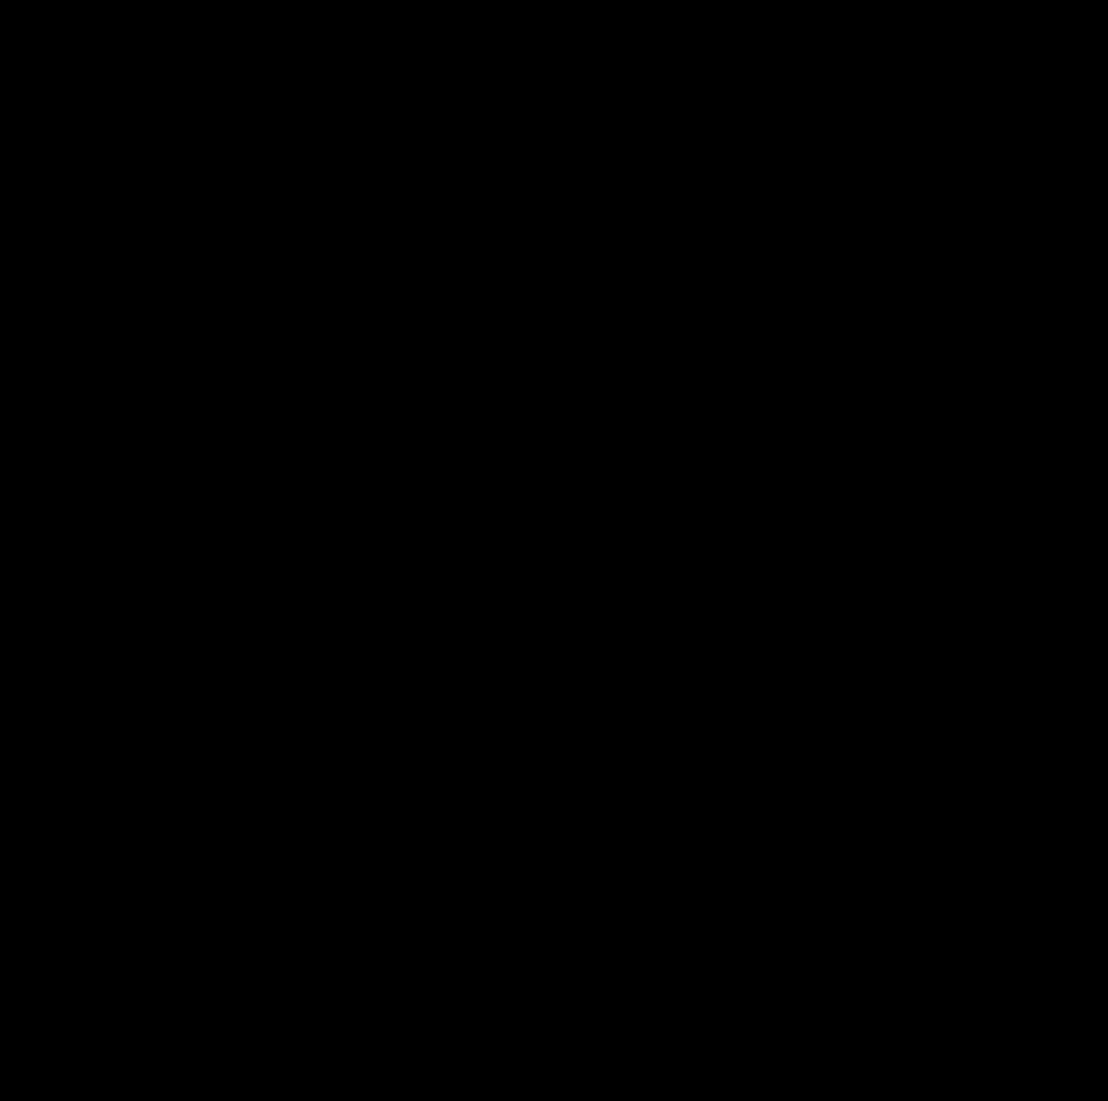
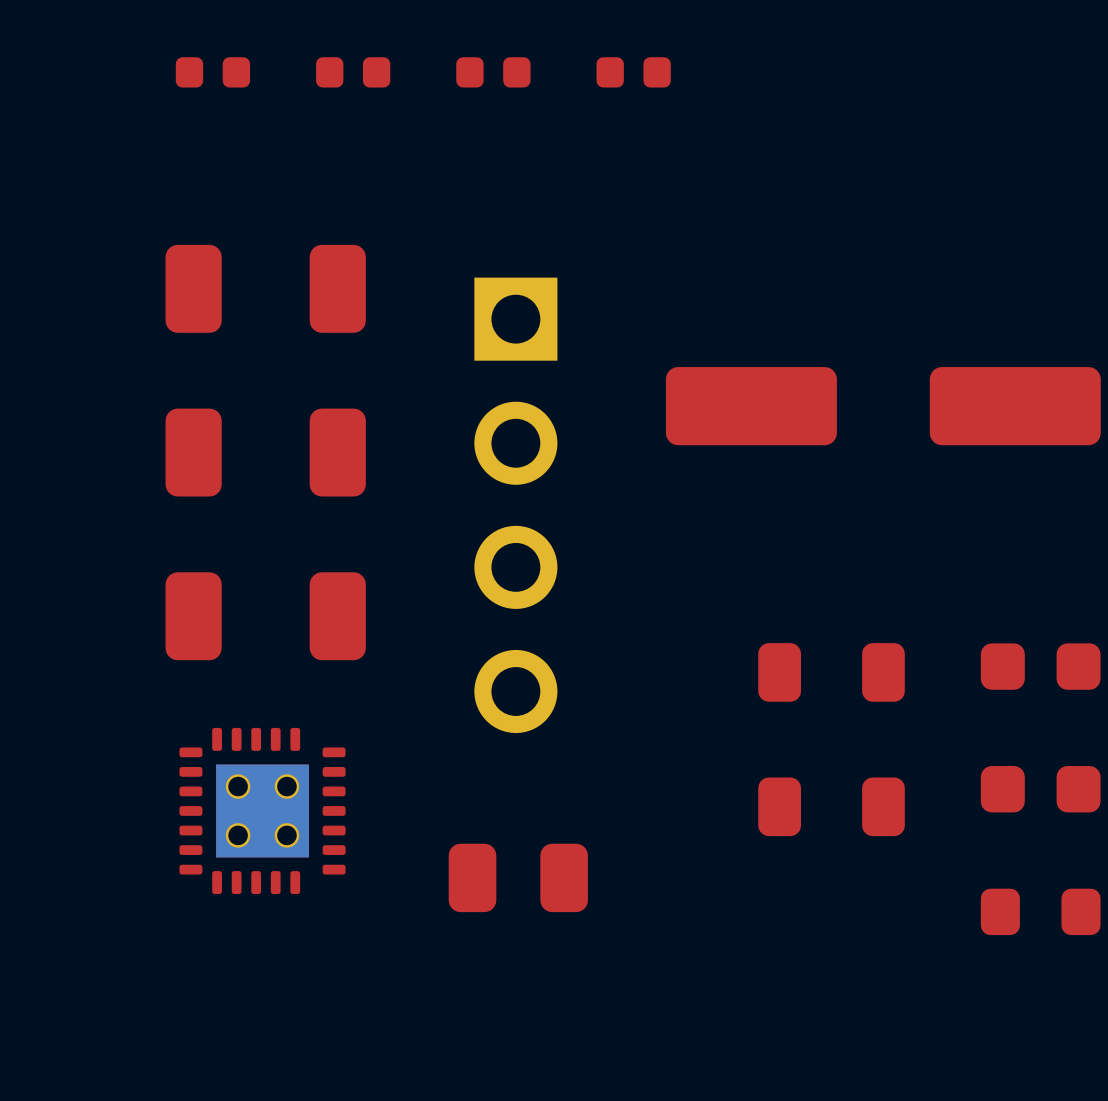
part: none -> (212, 72)
part: none -> (353, 72)
part: none -> (493, 72)
part: none -> (633, 72)
part: none -> (265, 288)
part: none -> (883, 406)
part: none -> (265, 452)
part: none -> (515, 505)
part: none -> (265, 616)
part: none -> (1040, 666)
part: none -> (831, 672)
part: none -> (1040, 789)
part: none -> (831, 806)
part: none -> (262, 810)
part: none -> (518, 877)
part: none -> (1040, 911)

